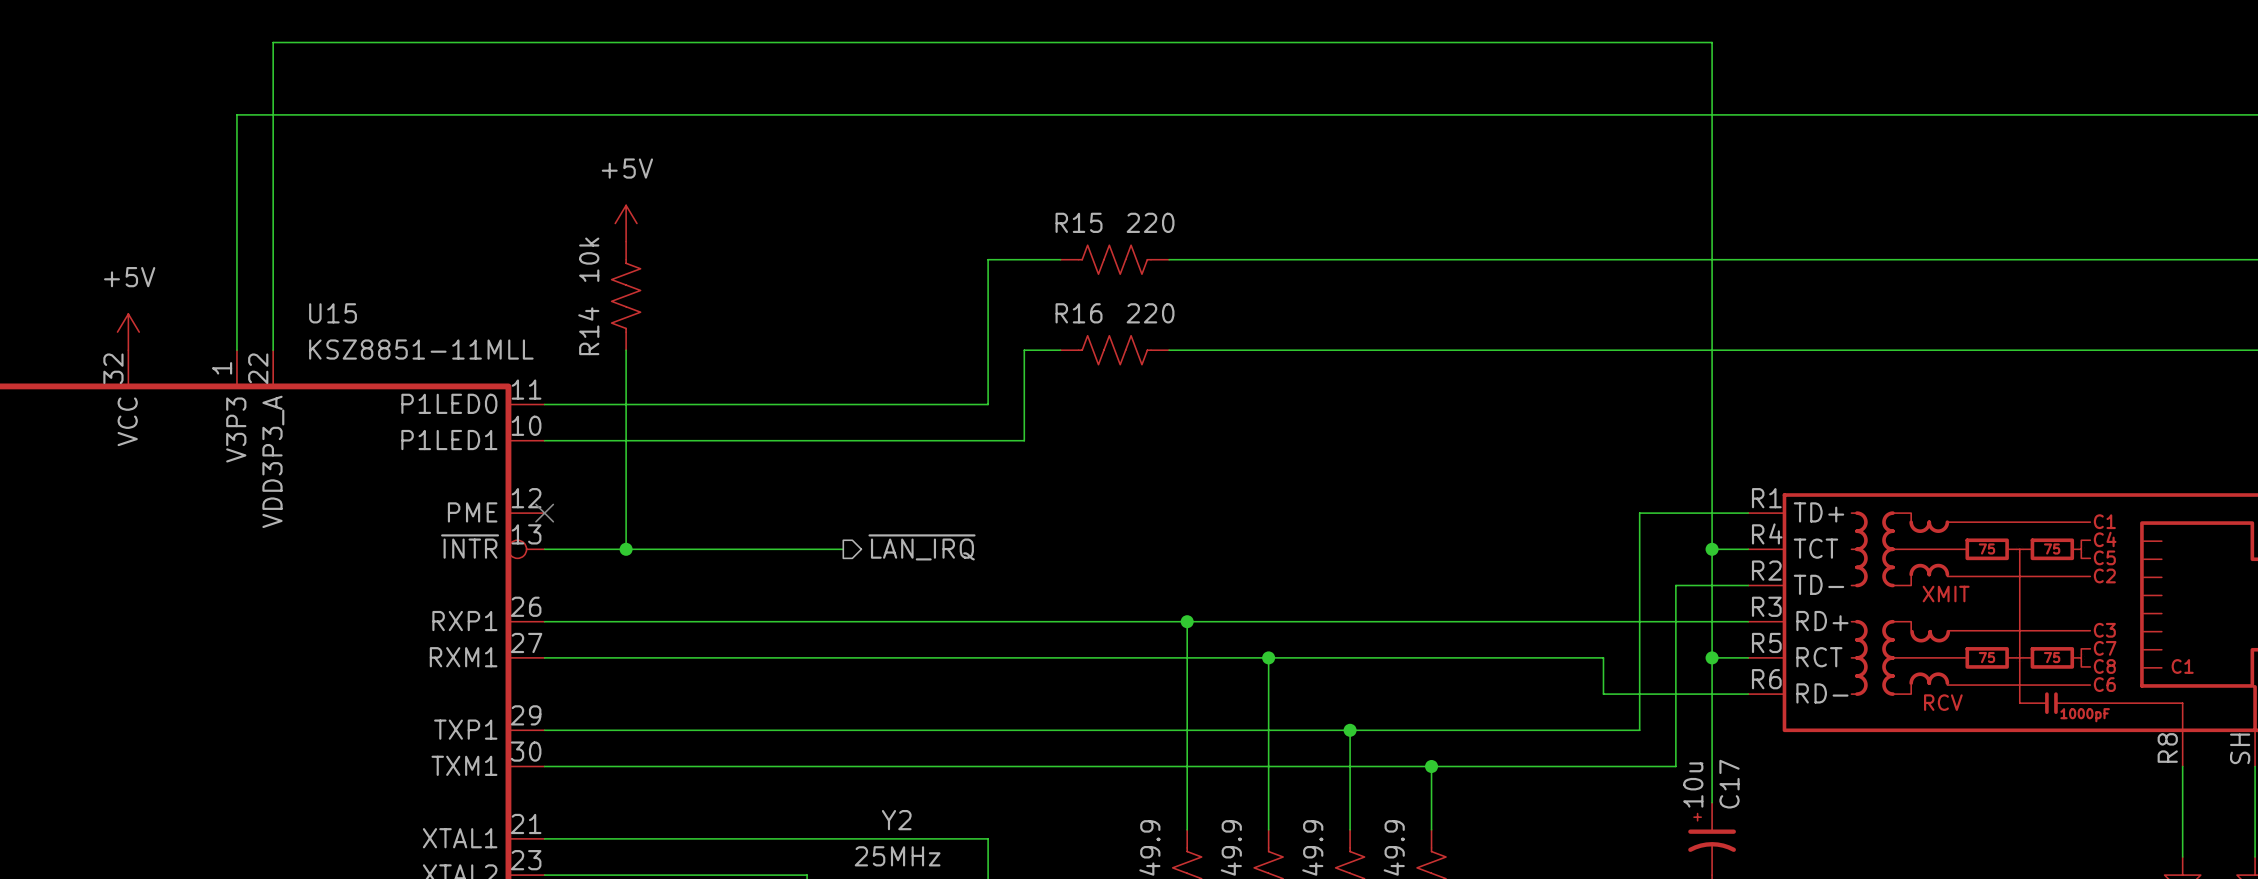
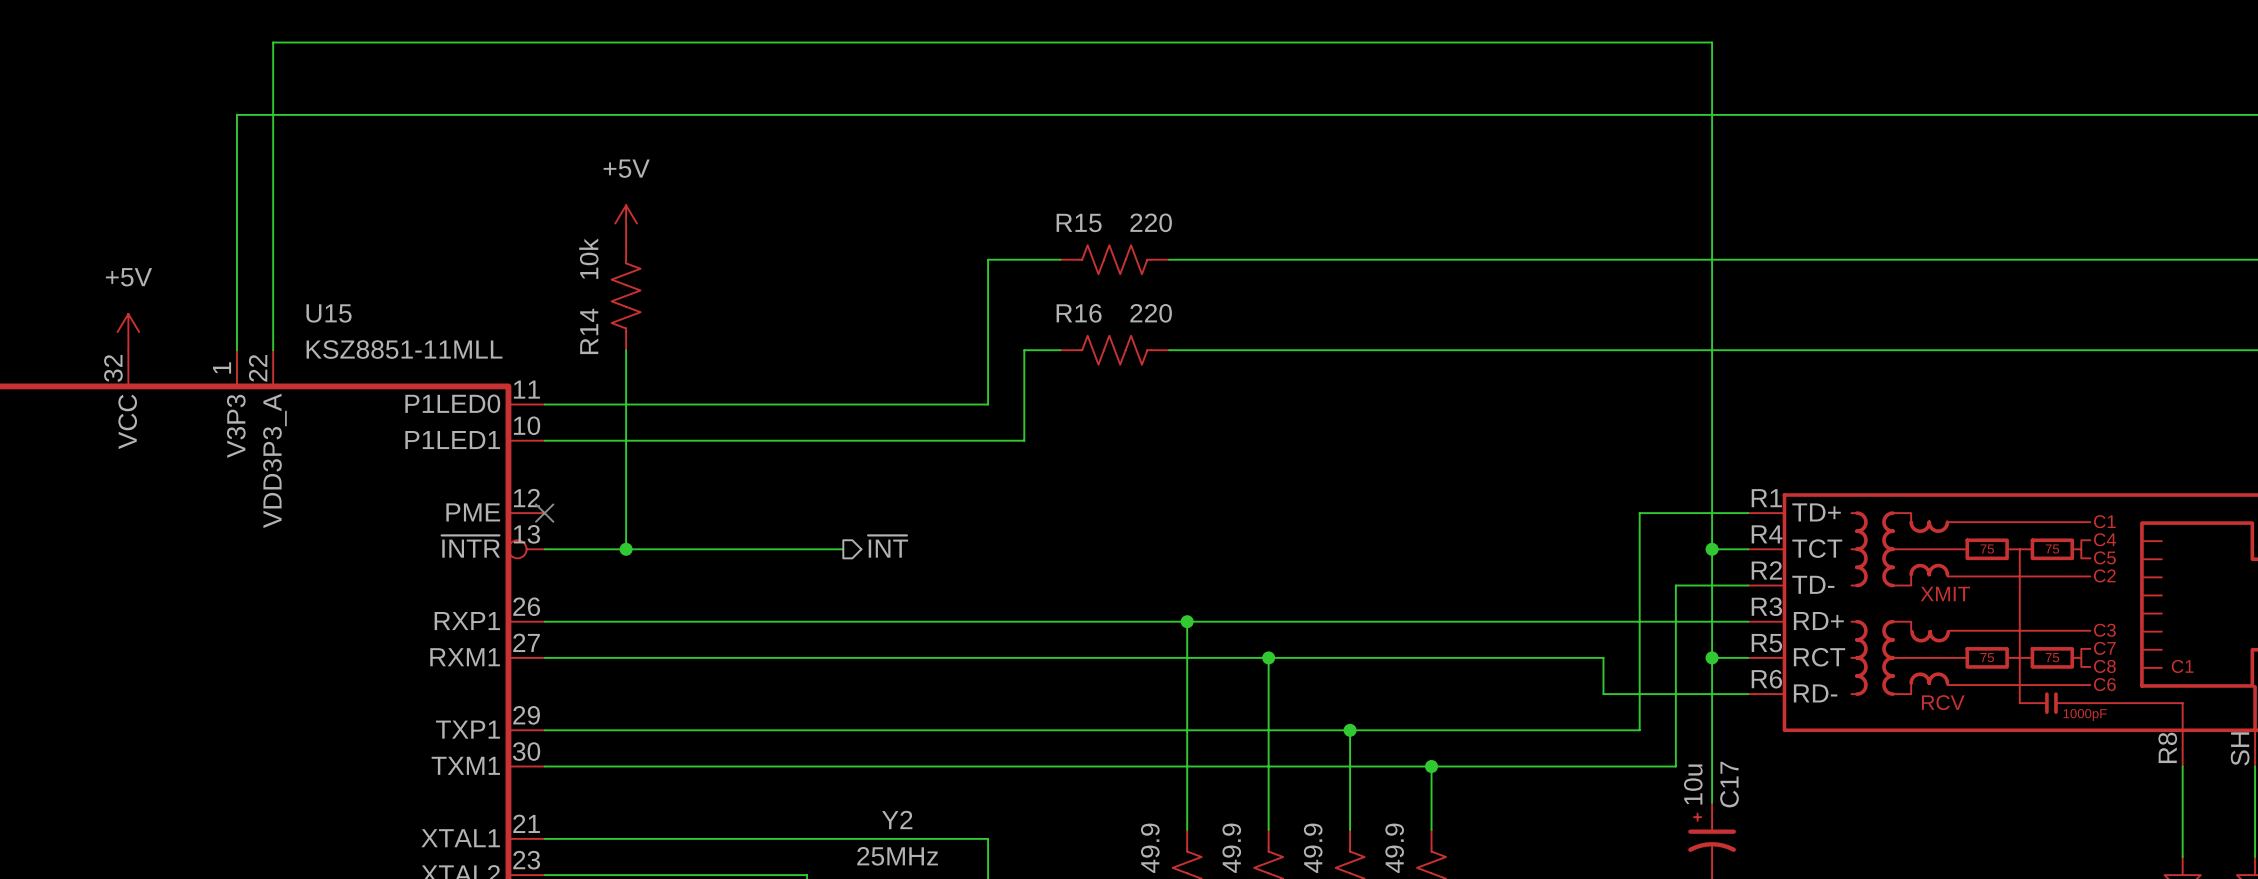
hierarchical label: ~{LAN_IRQ} (922, 547) -> ~{INT} (888, 546)

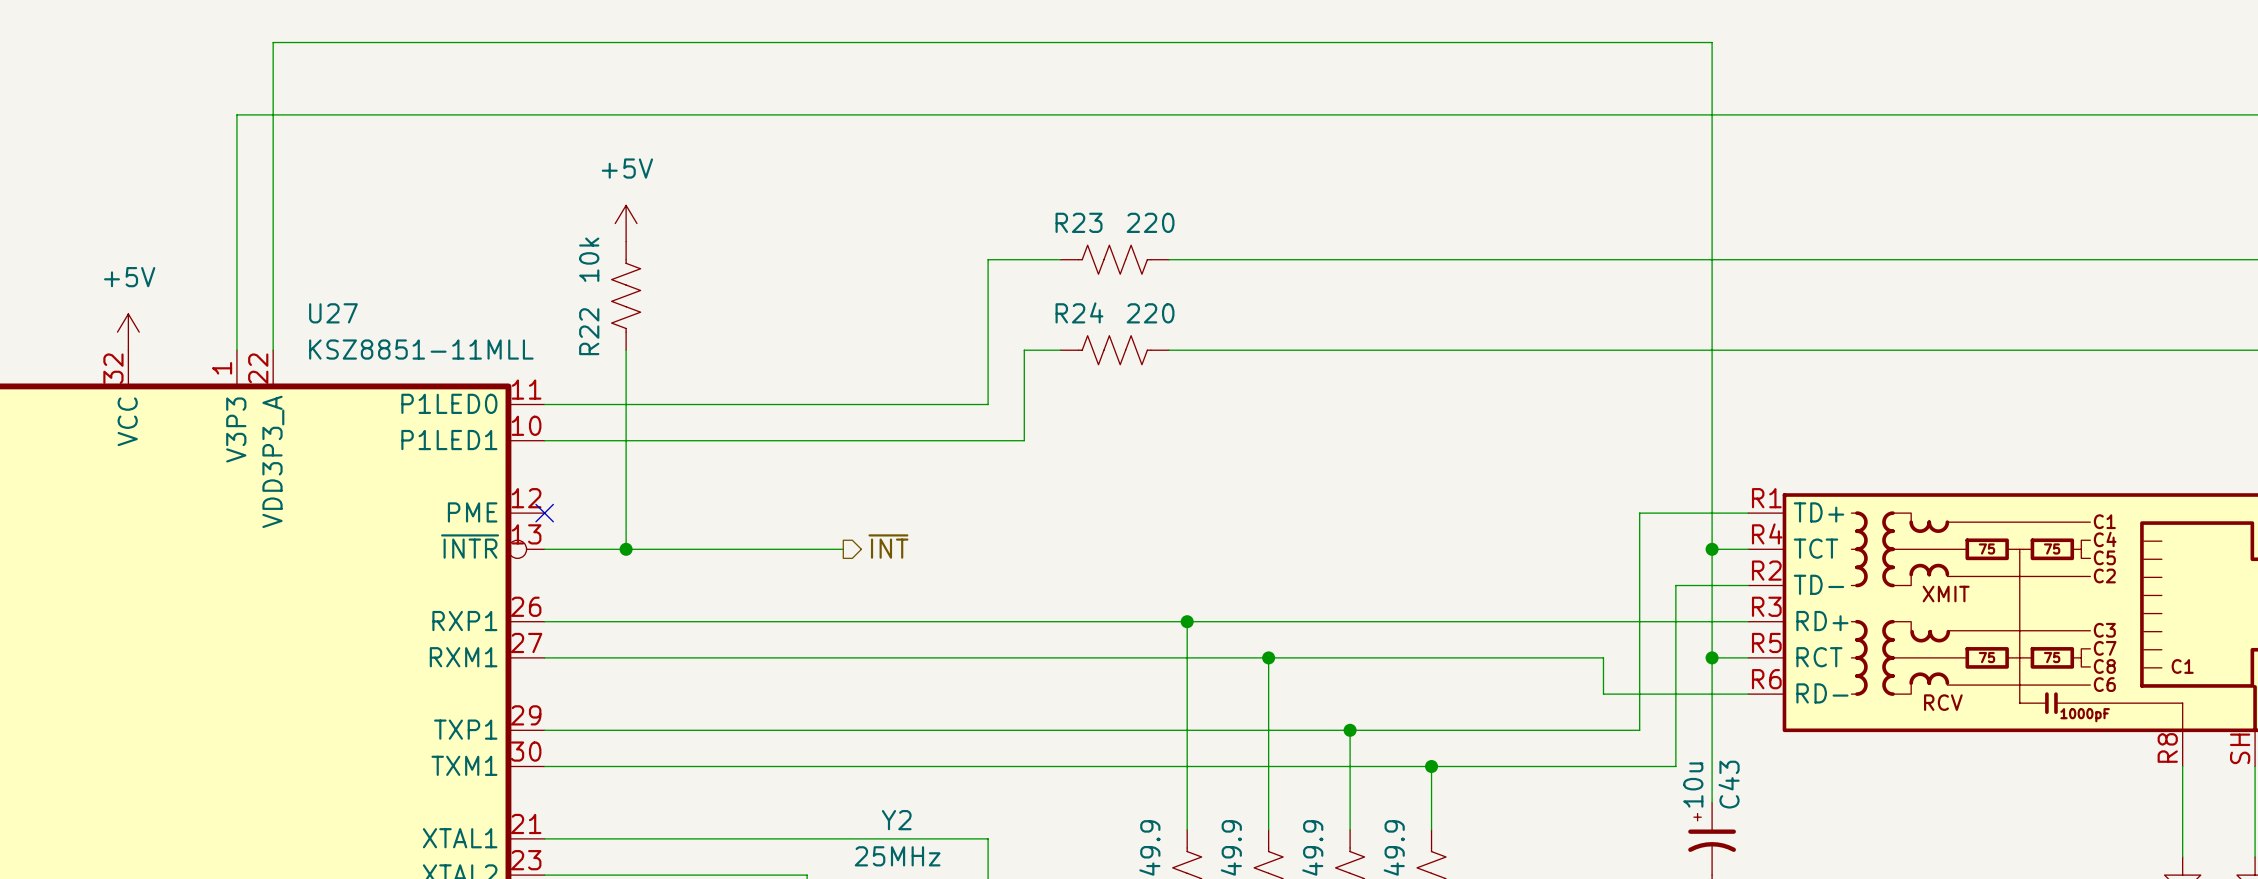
R15 name: R15 (1079, 222) -> R23 (1079, 222)
U15 name: U15 (329, 313) -> U27 (333, 313)
R16 name: R16 (1079, 313) -> R24 (1079, 312)
R14 name: R14 (589, 331) -> R22 (589, 331)
C17 name: C17 (1729, 784) -> C43 (1729, 784)

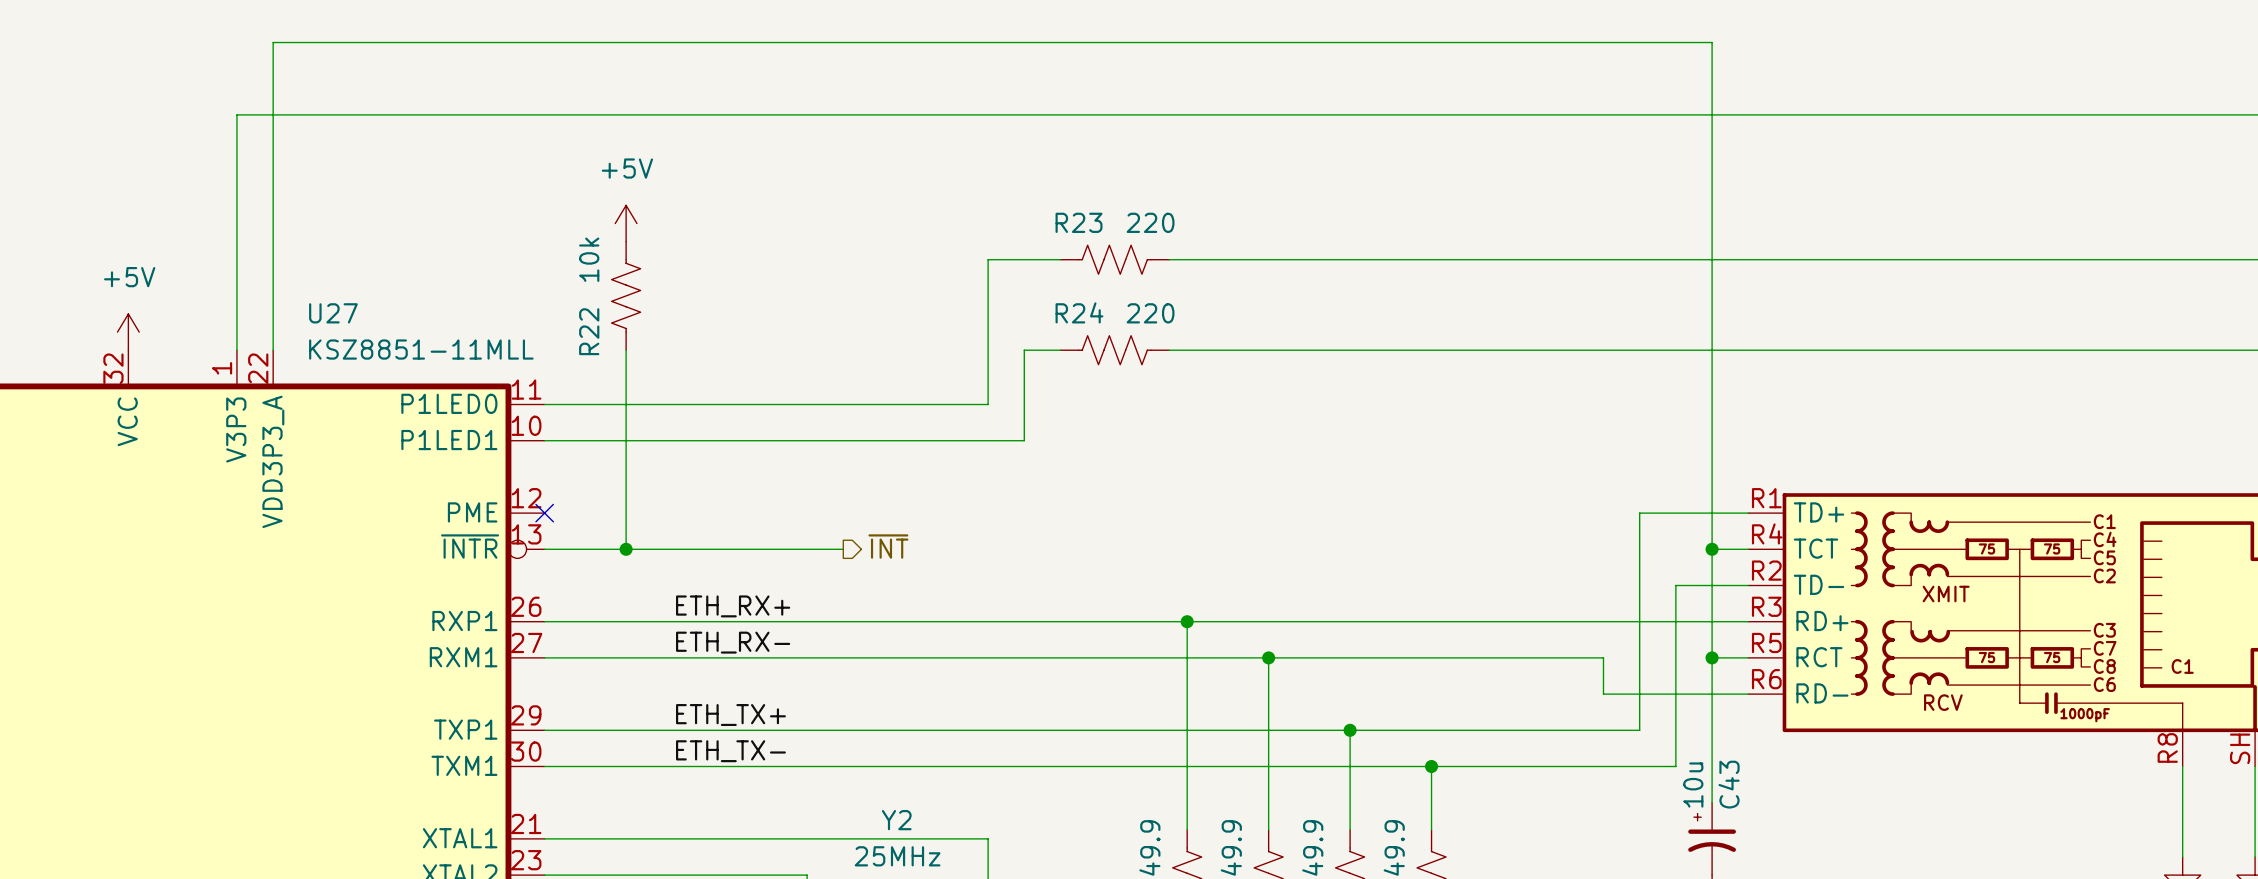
label: none -> ETH_RX+ (733, 606)
label: none -> ETH_RX- (733, 642)
label: none -> ETH_TX+ (730, 715)
label: none -> ETH_TX- (730, 751)

